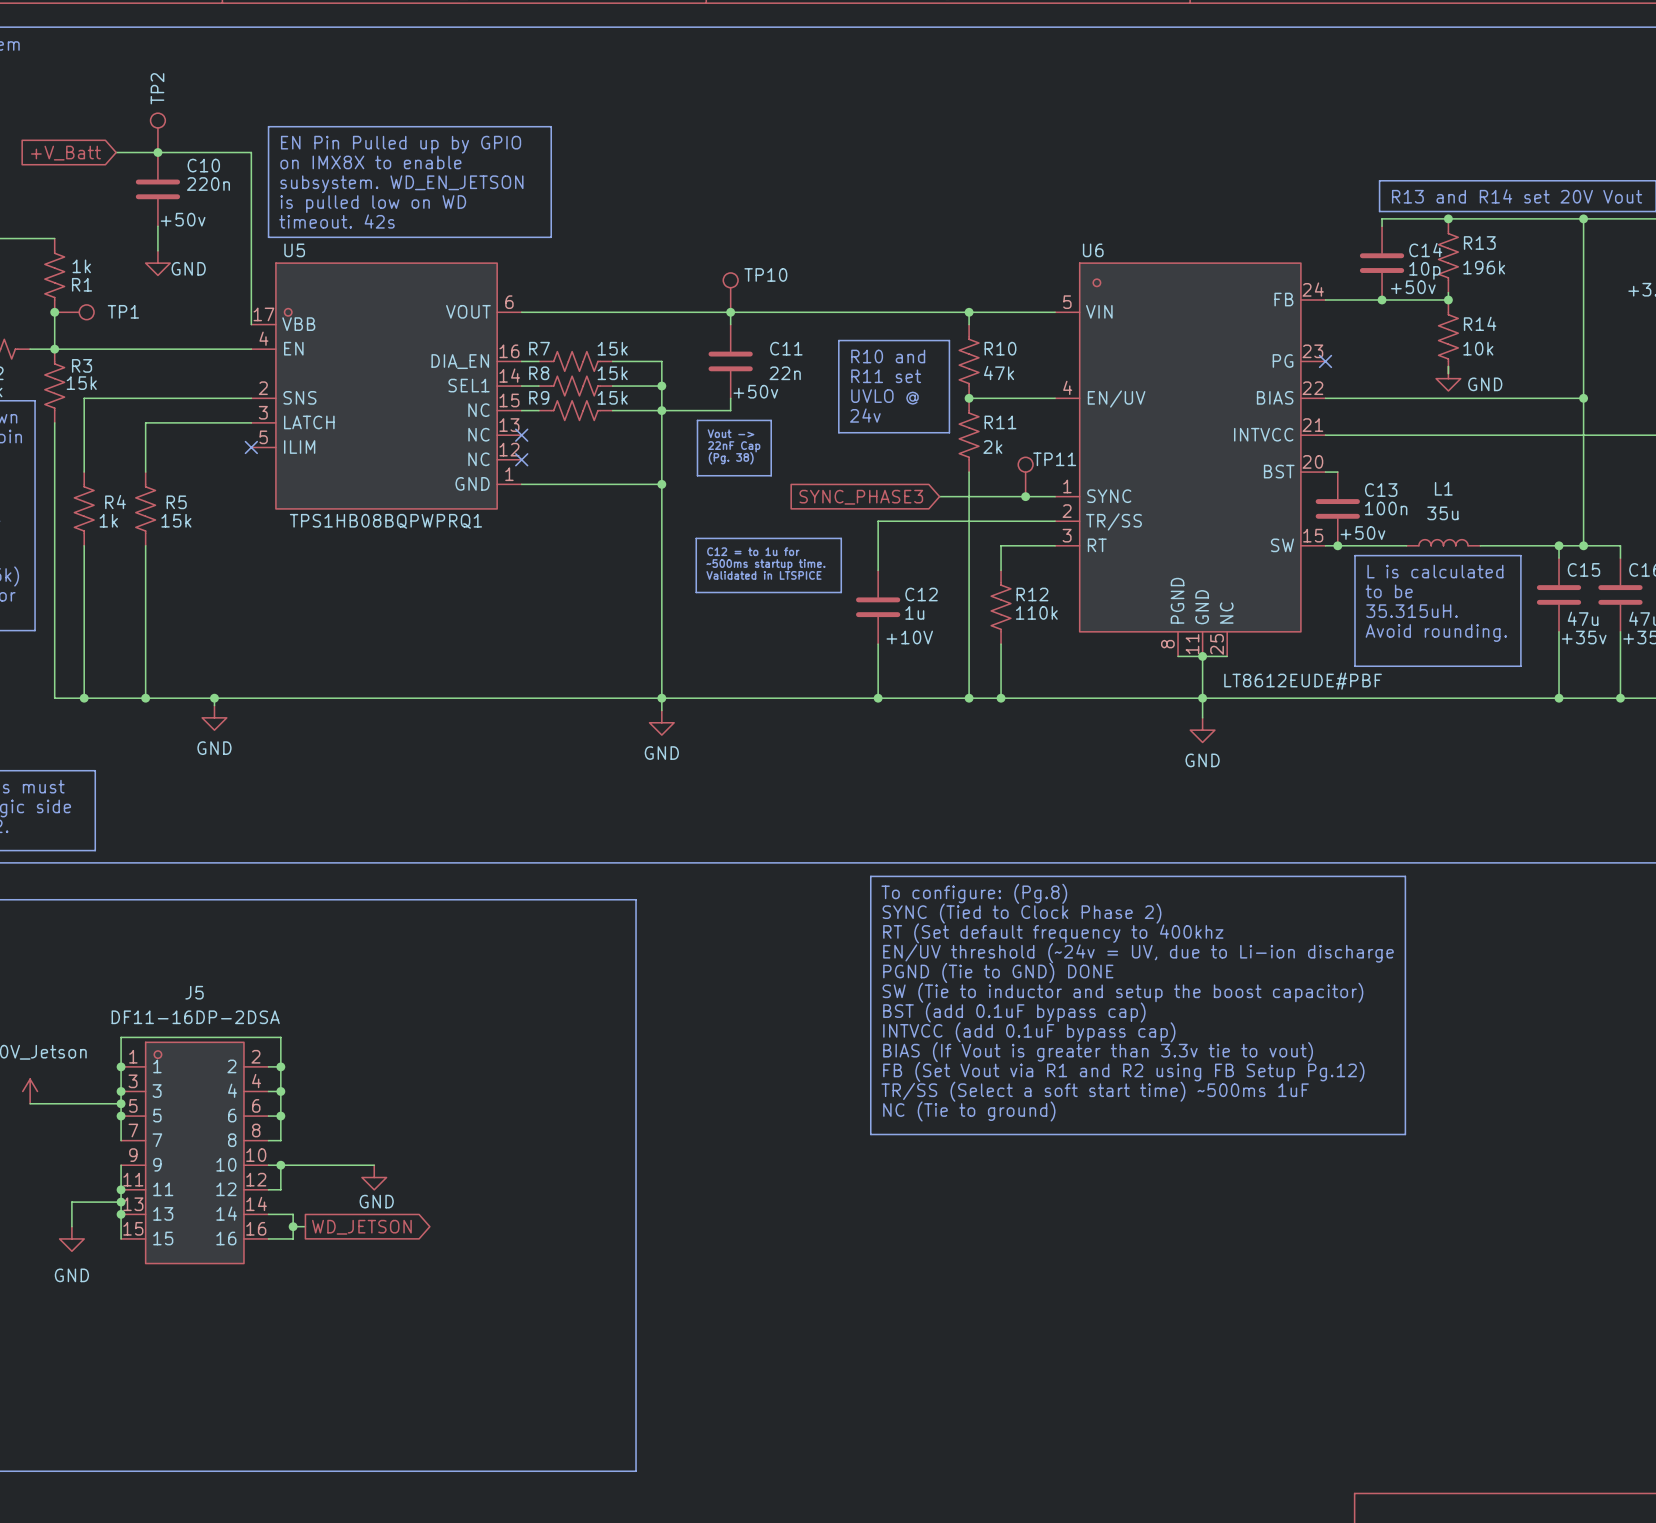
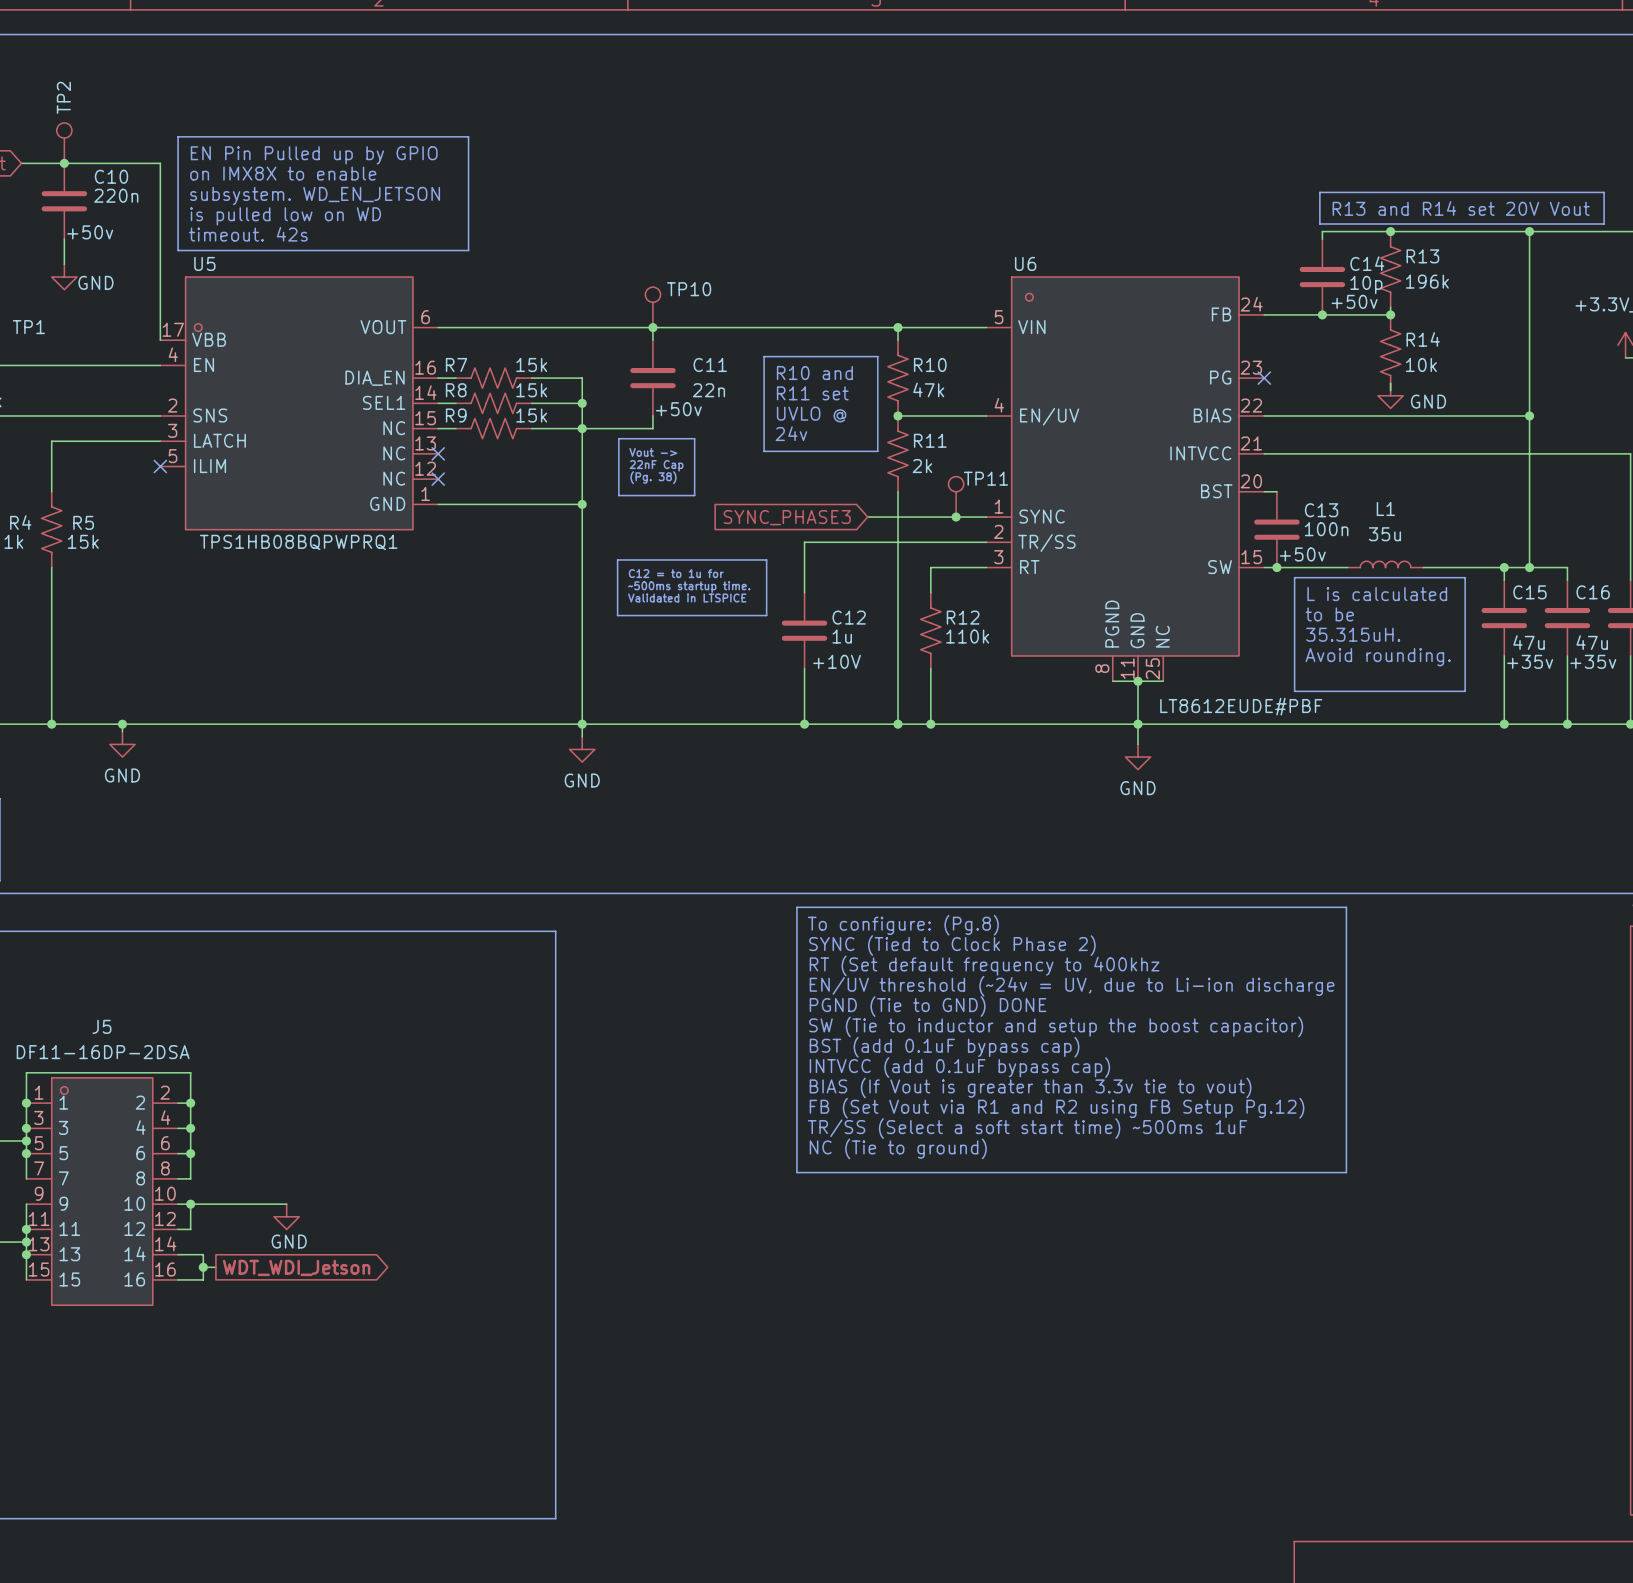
global label: WD_JETSON (361, 1227) -> WDT_WDI_Jetson (296, 1267)

